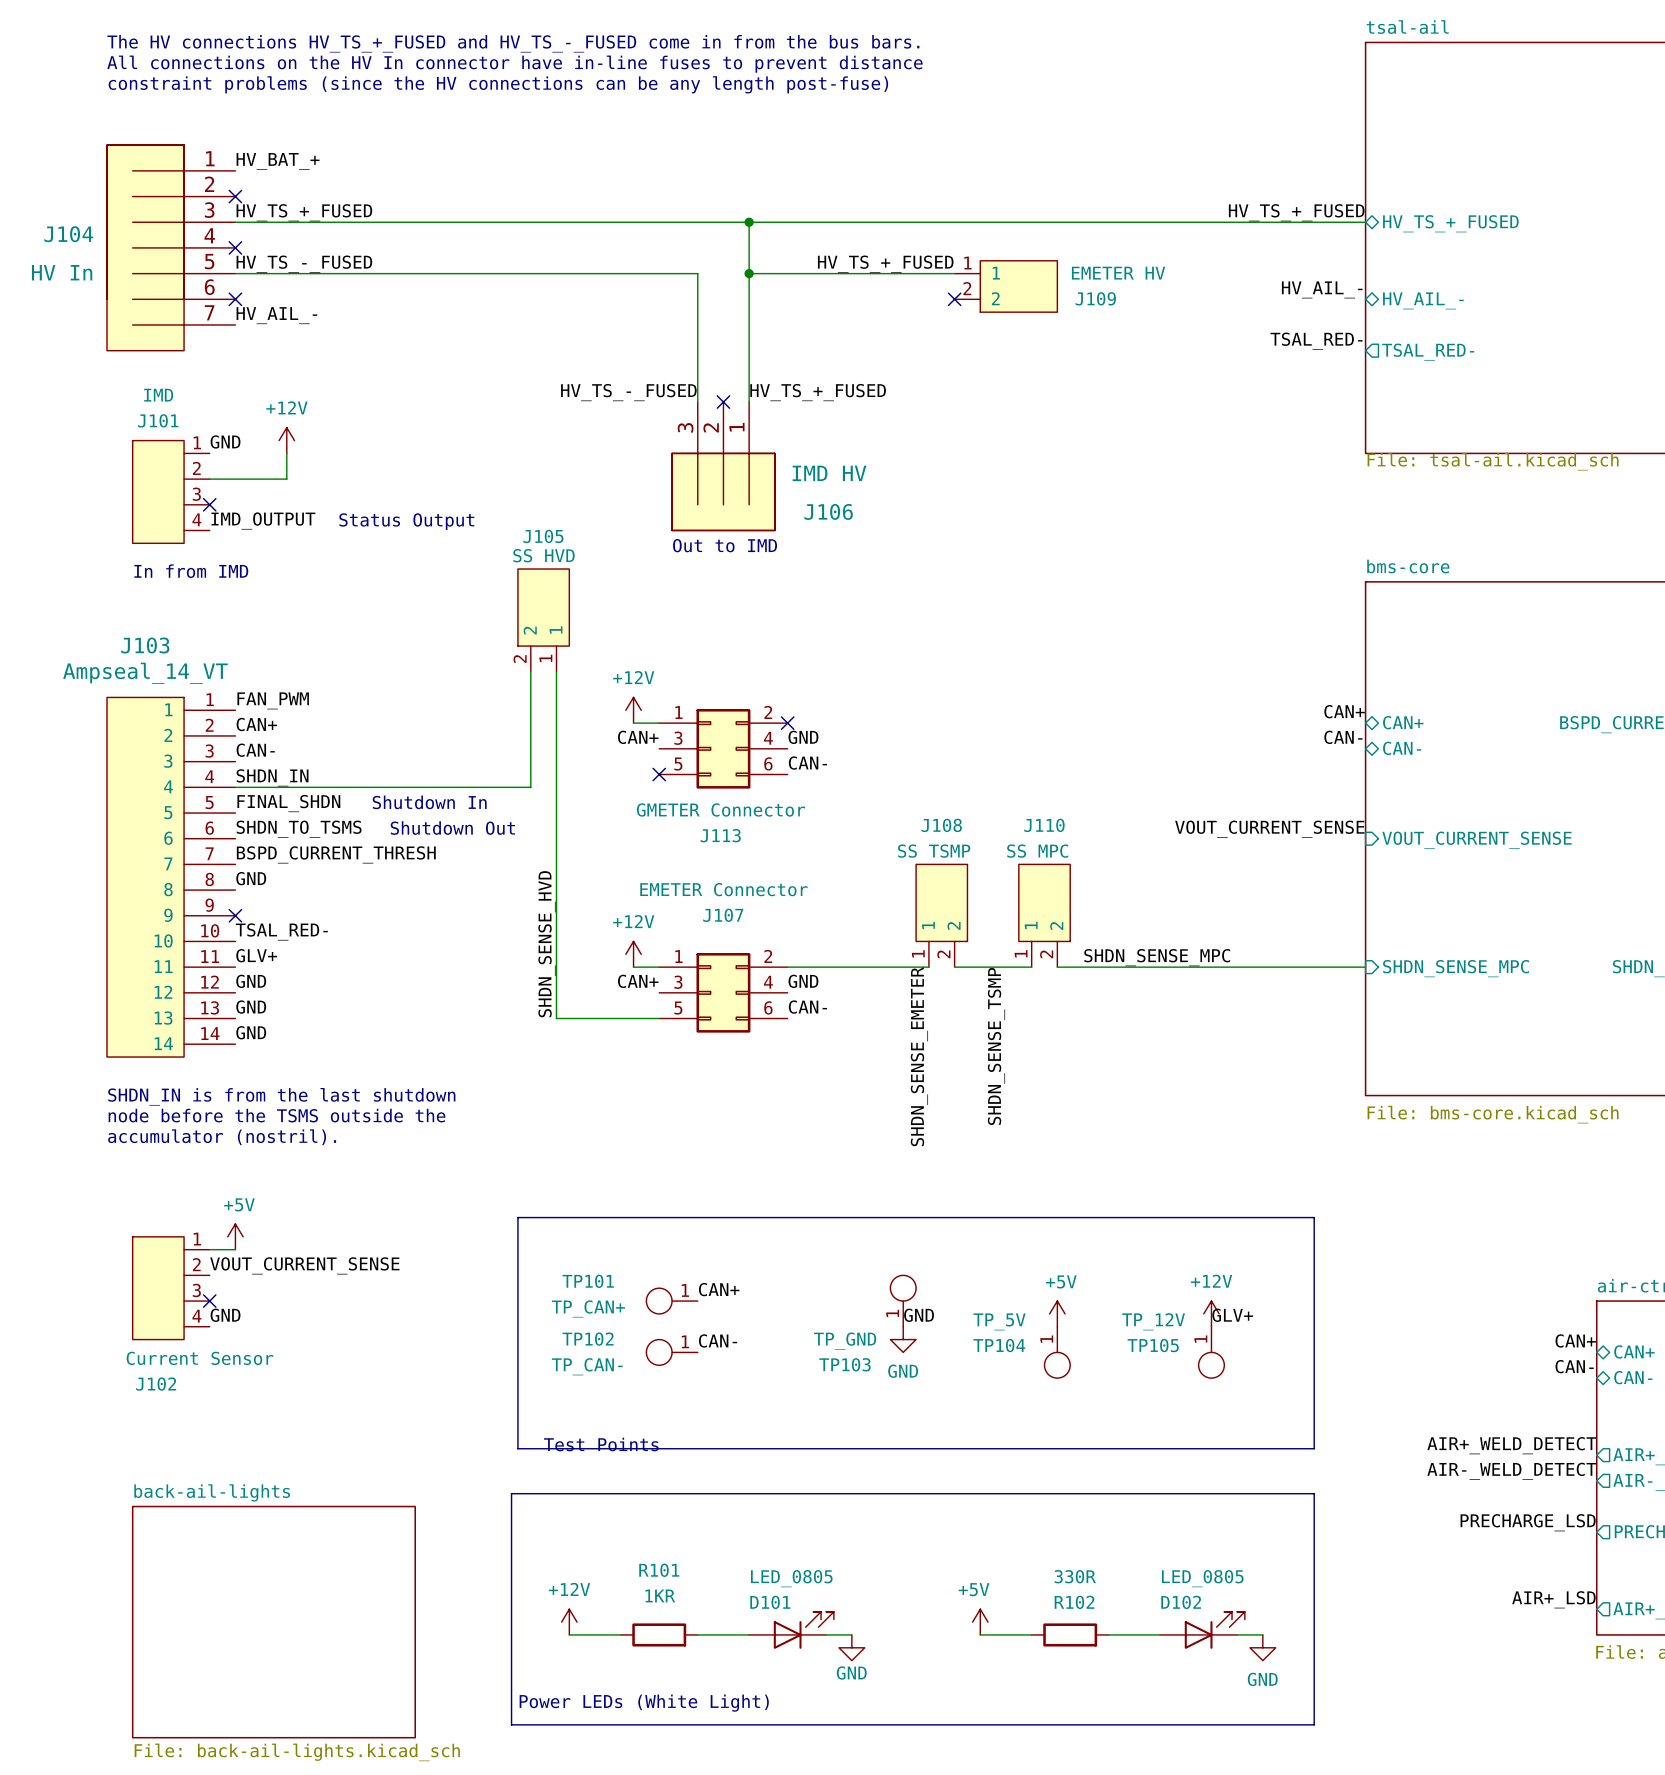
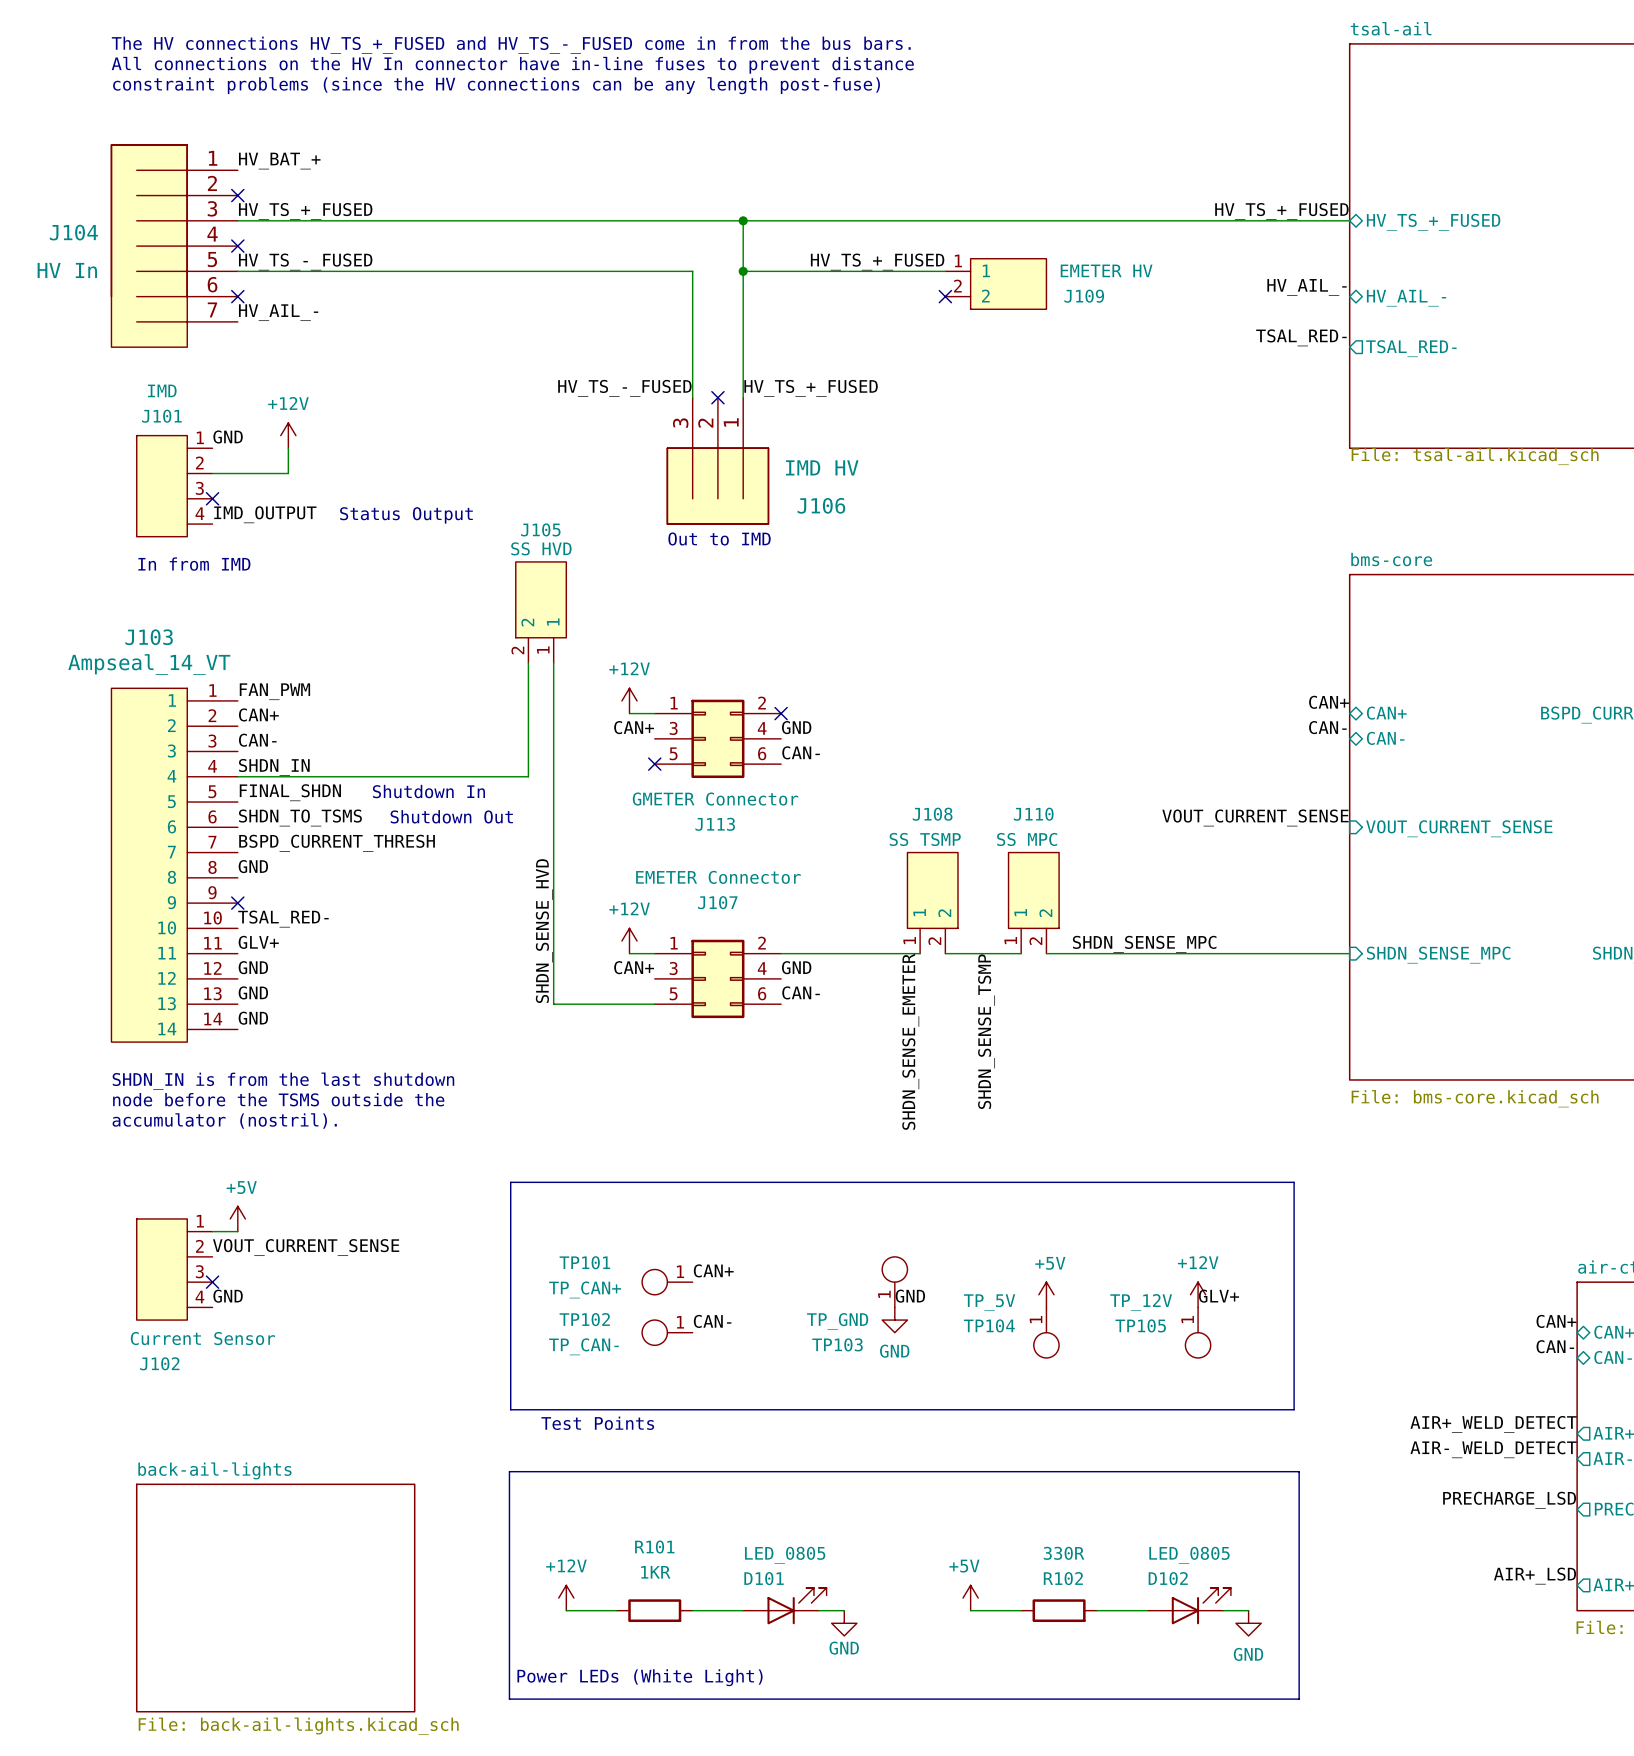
line: (517, 1217) (1314, 1217) (1314, 1448) (517, 1448) (517, 1217) -> (510, 1182) (1294, 1182) (1294, 1409) (510, 1409) (510, 1182)

